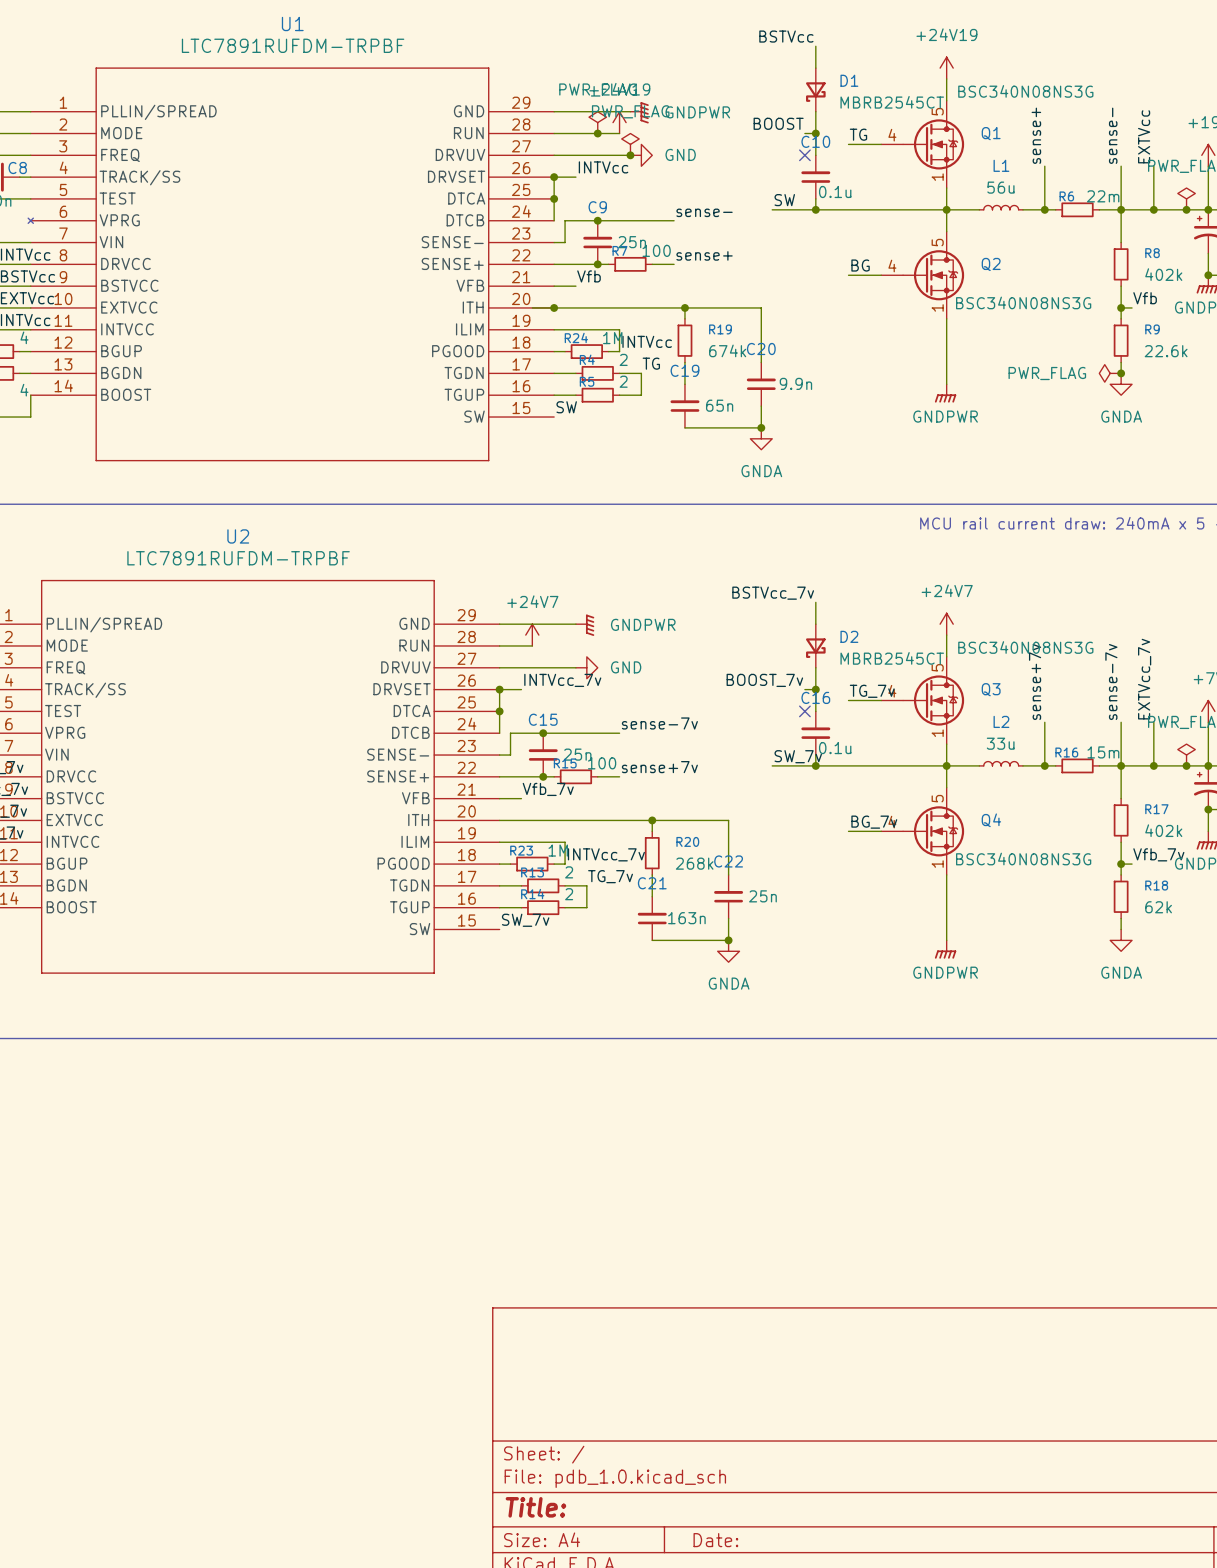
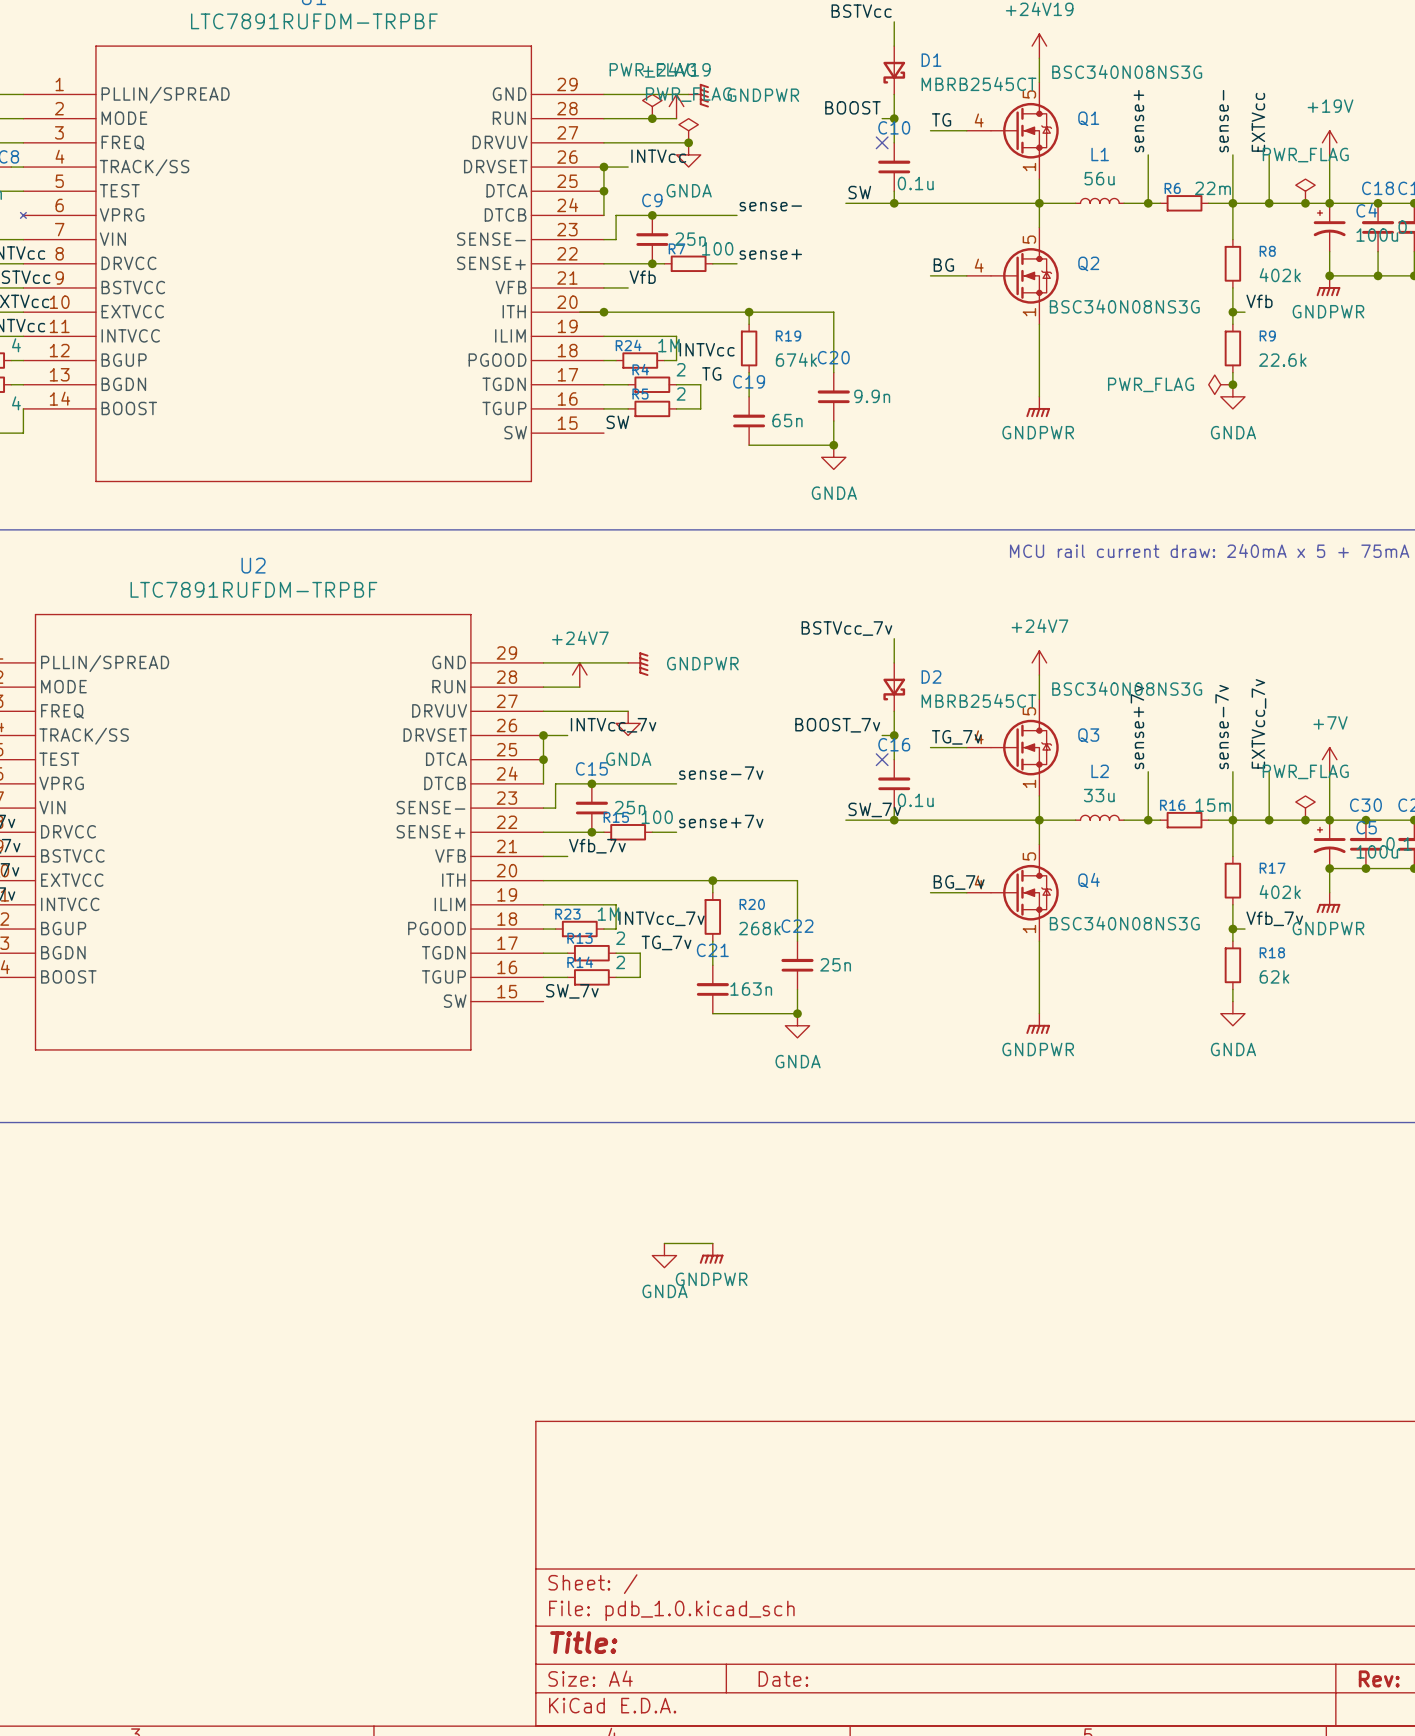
power symbol: GND (641, 155) -> none
power symbol: none -> GNDA (688, 154)
power symbol: GND (586, 667) -> none
power symbol: none -> GNDA (628, 723)
wire: none -> (664, 1243) (712, 1243)
power symbol: none -> GNDPWR (711, 1253)
power symbol: none -> GNDA (664, 1255)

